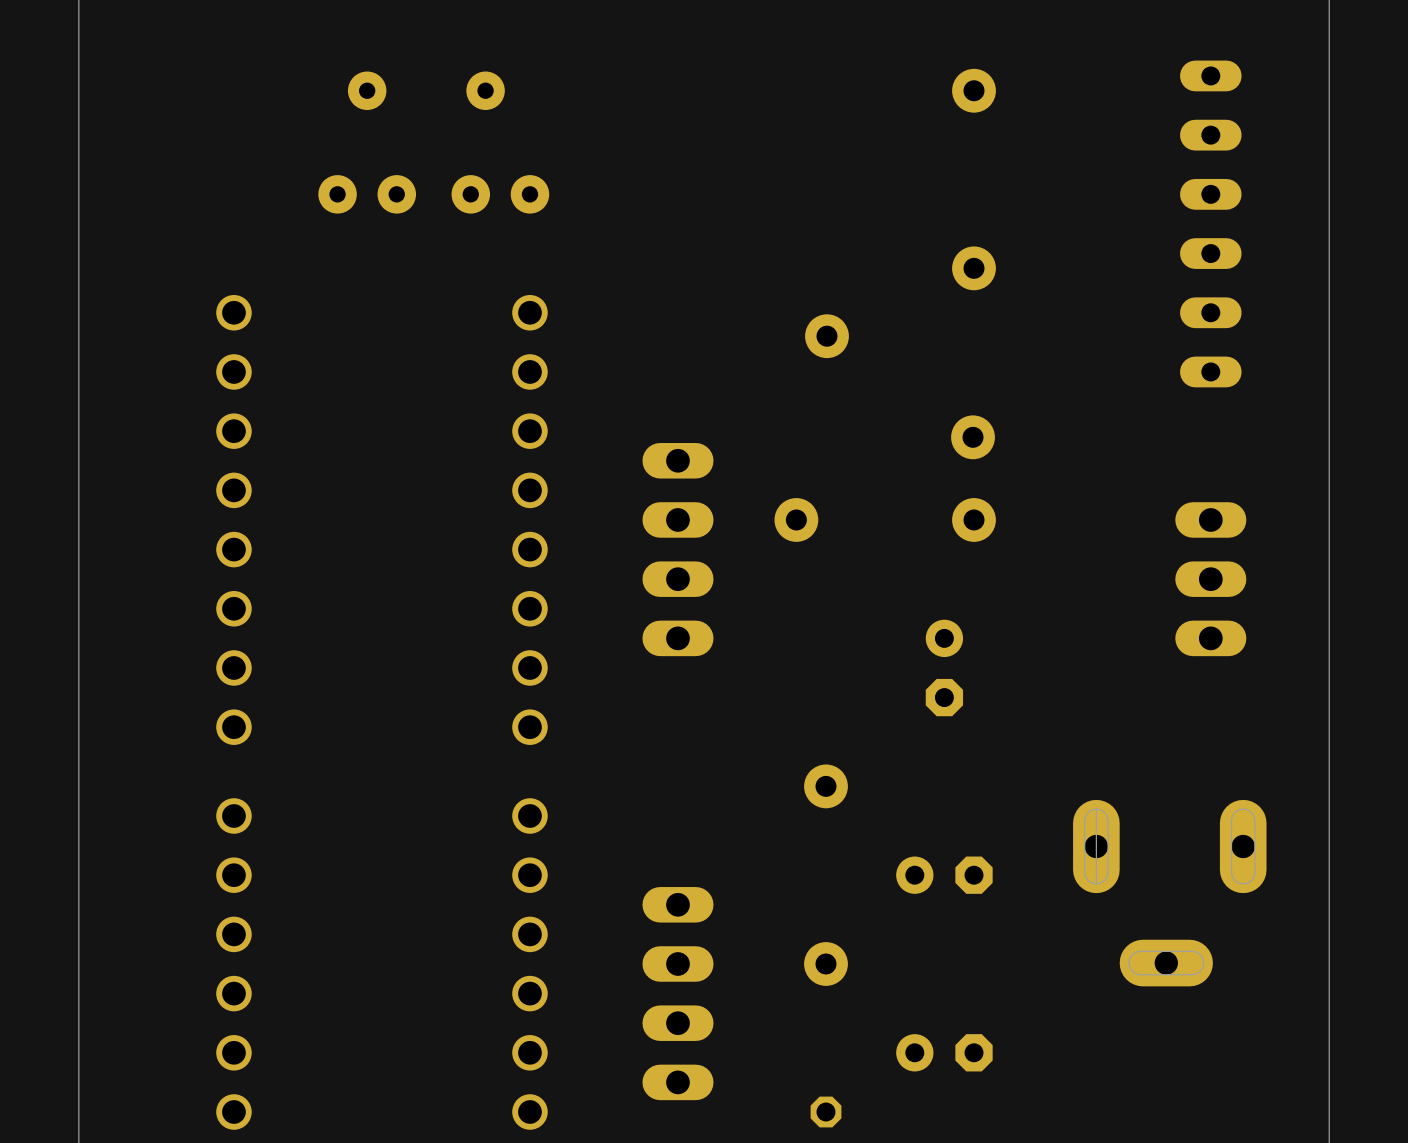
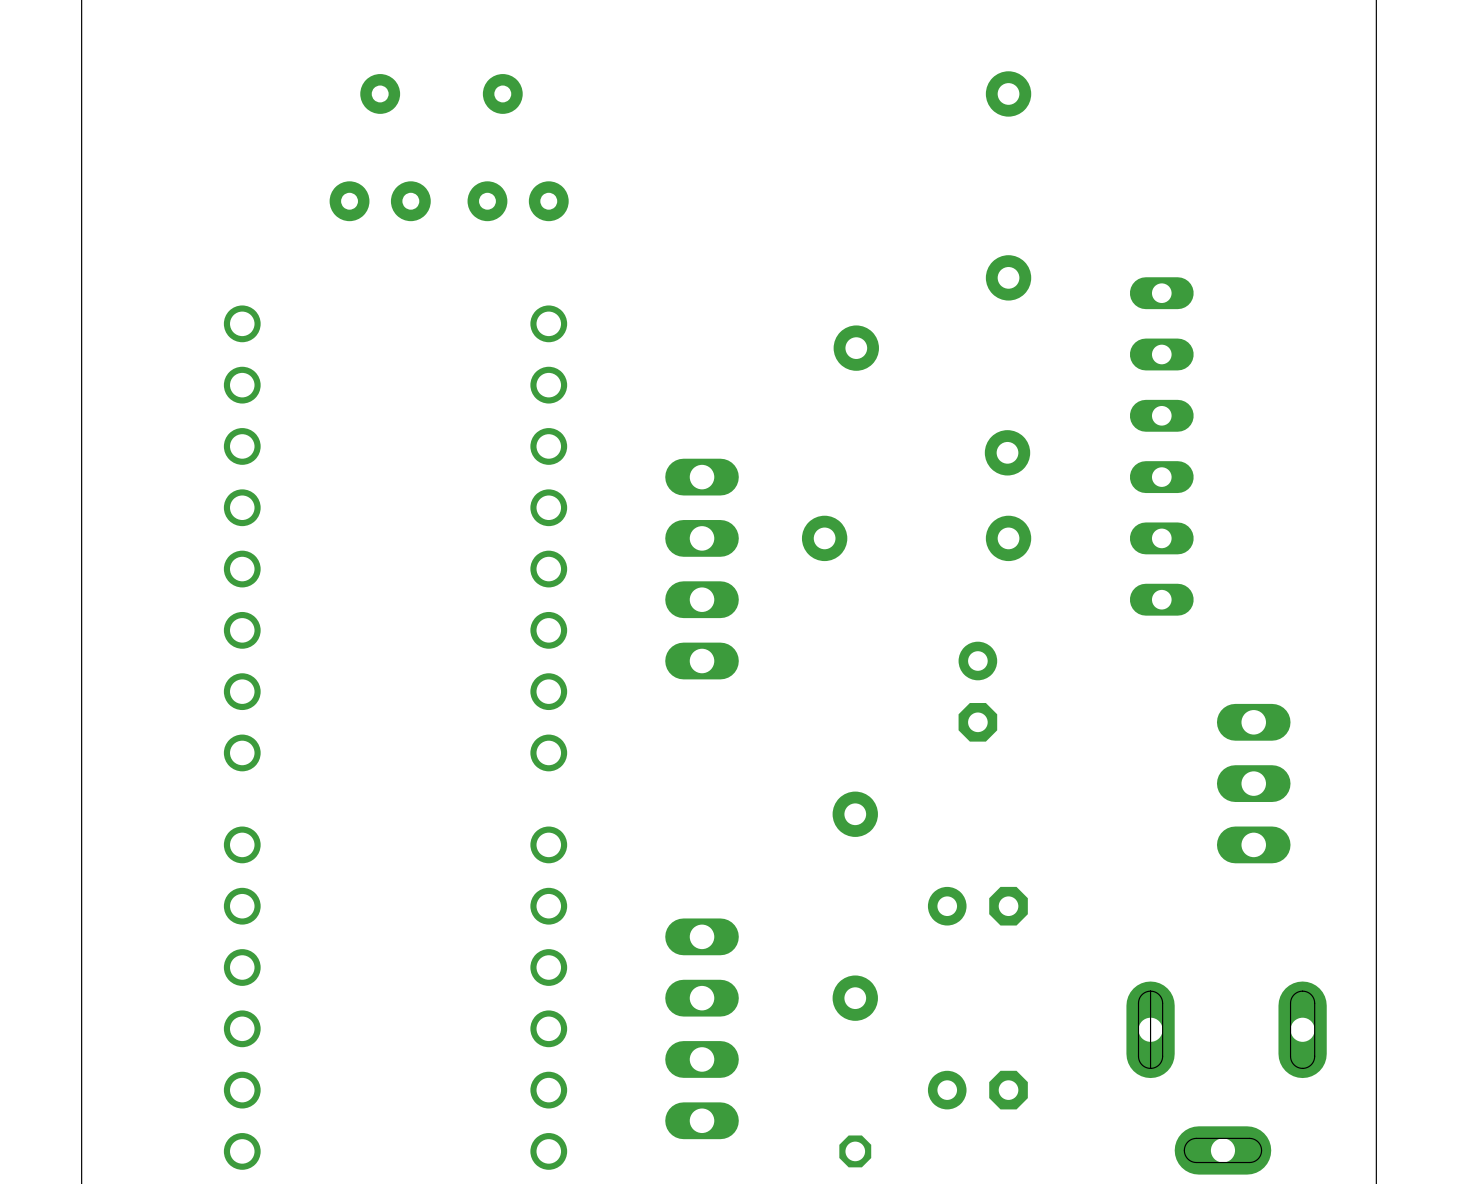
part position: (1210, 223) -> (1161, 446)
part position: (1210, 579) -> (1253, 783)
part position: (1169, 893) -> (1226, 1078)

